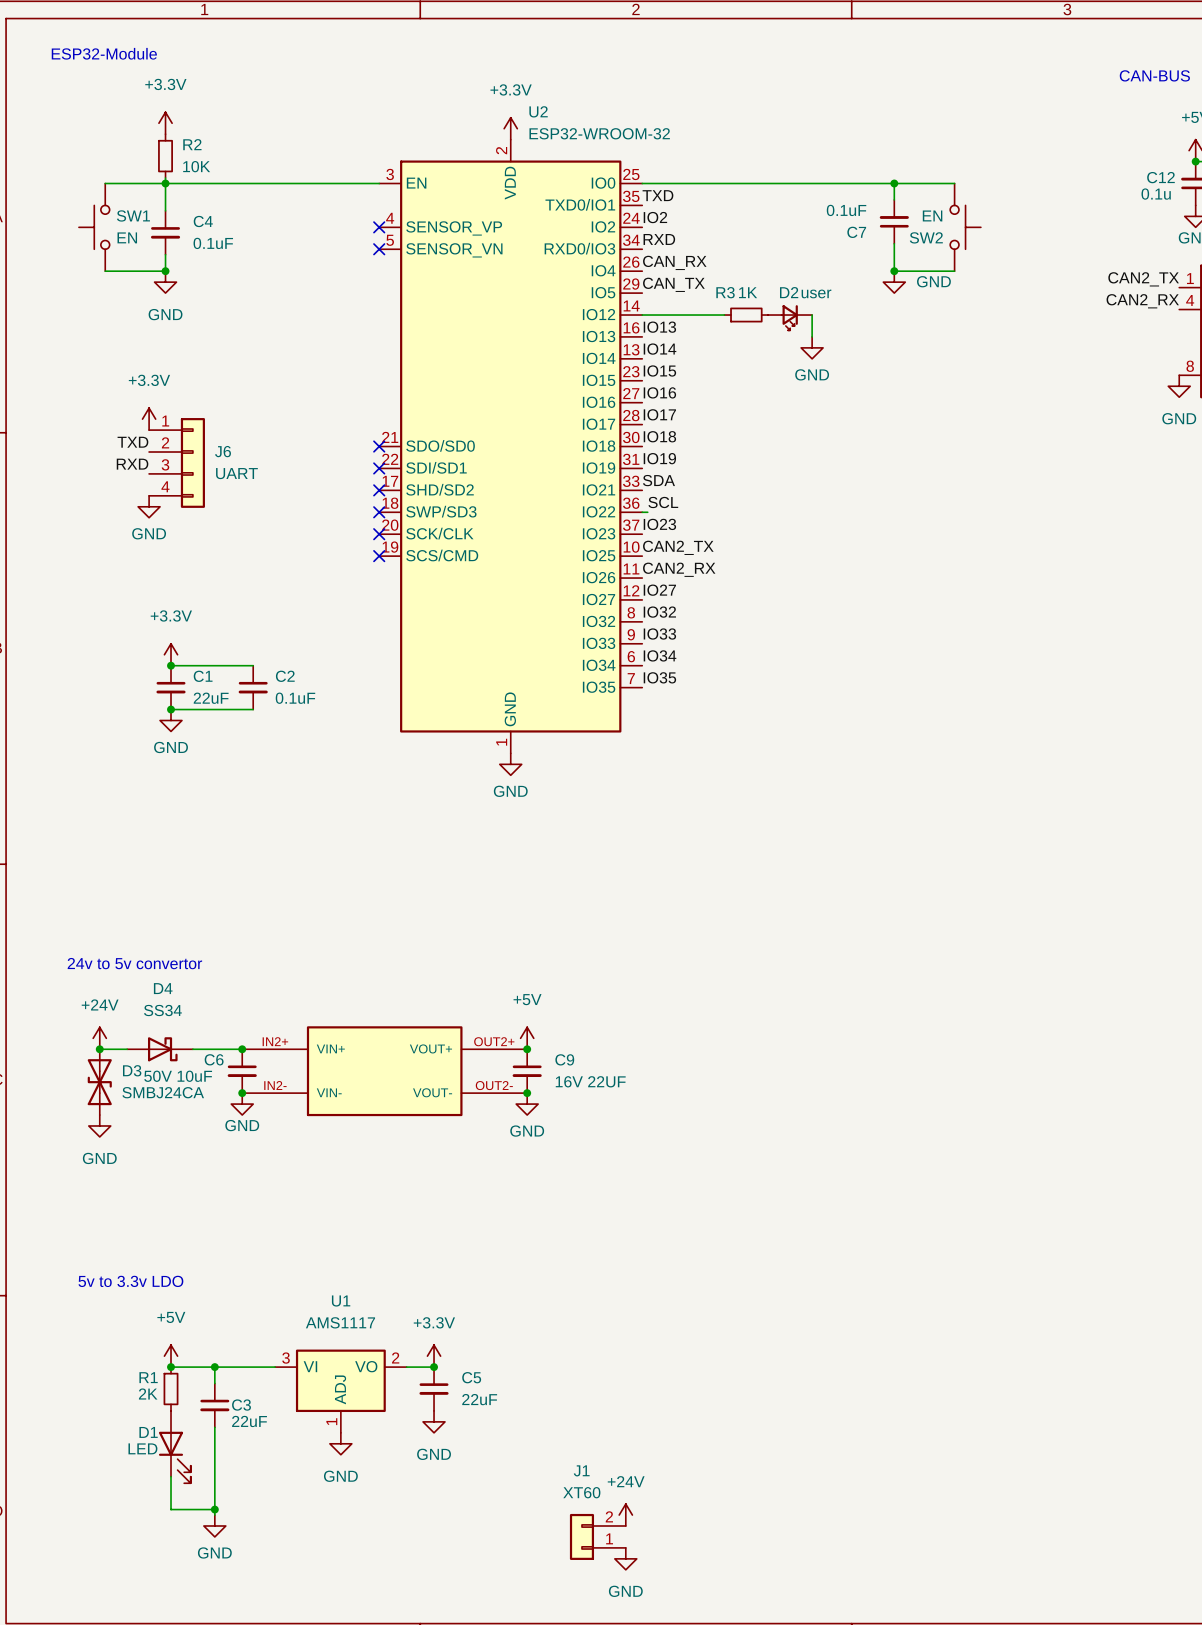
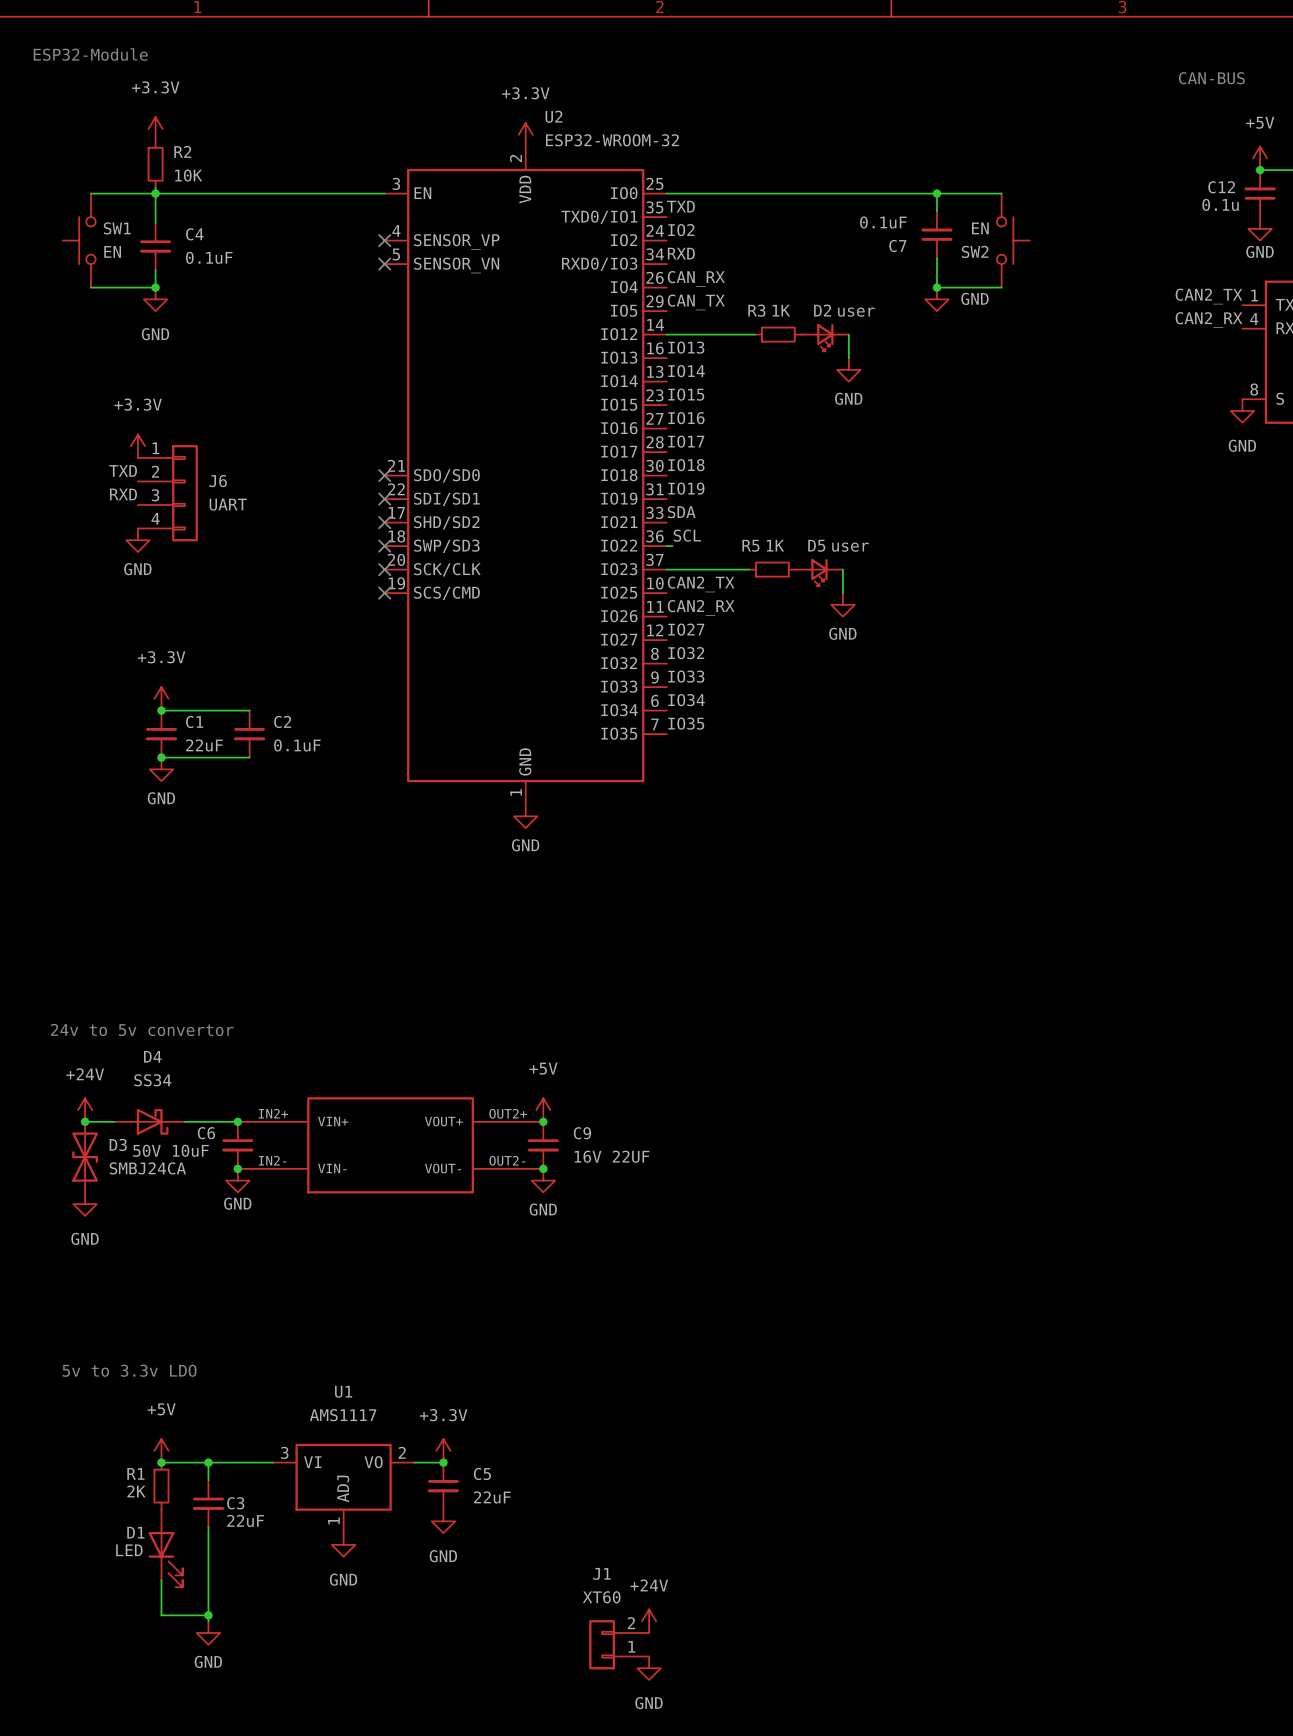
label: IO23 (659, 524) -> none
wire: none -> (666, 569) (748, 569)
R5: none -> 1K (772, 569)
wire: none -> (842, 569) (842, 593)
D5: none -> user (819, 572)
power symbol: none -> GND (842, 604)

